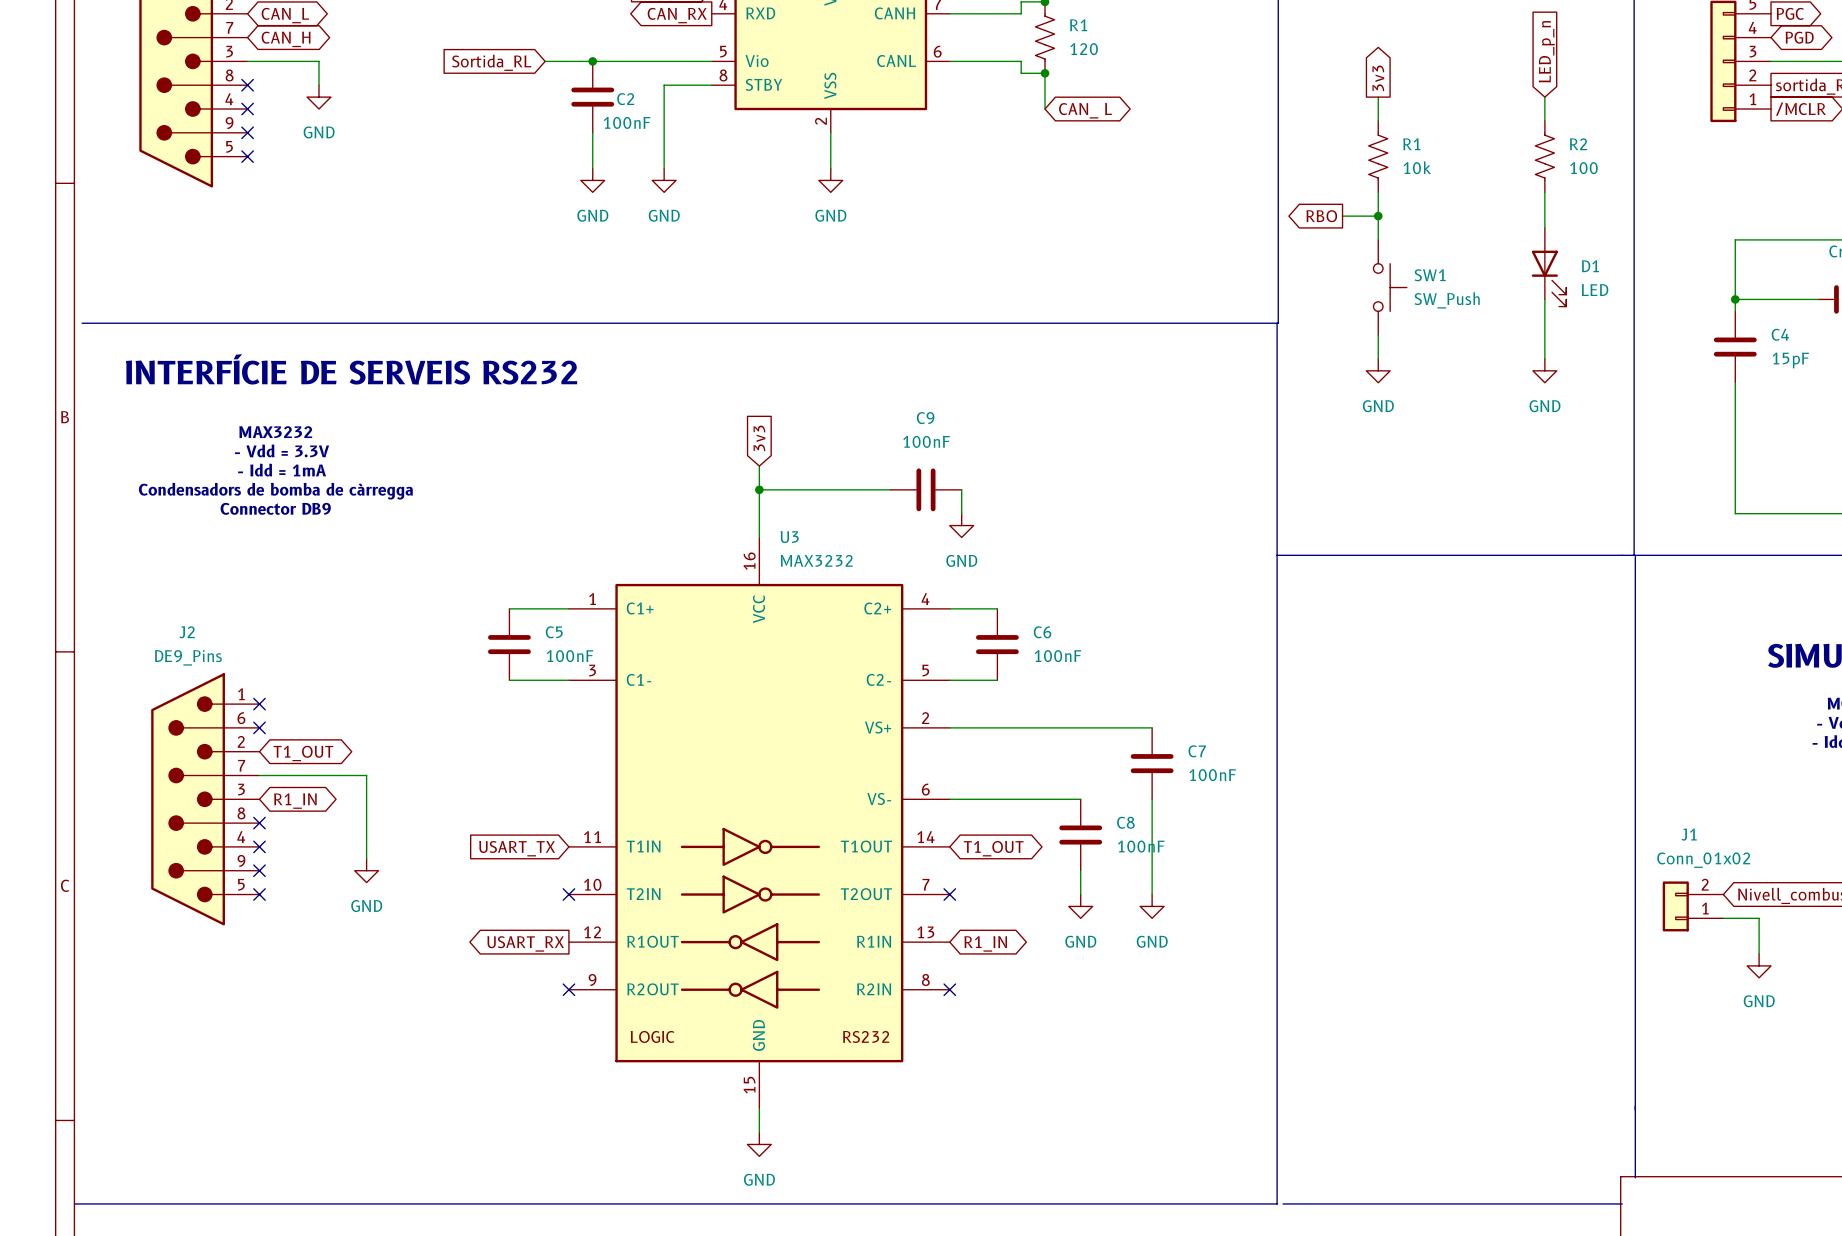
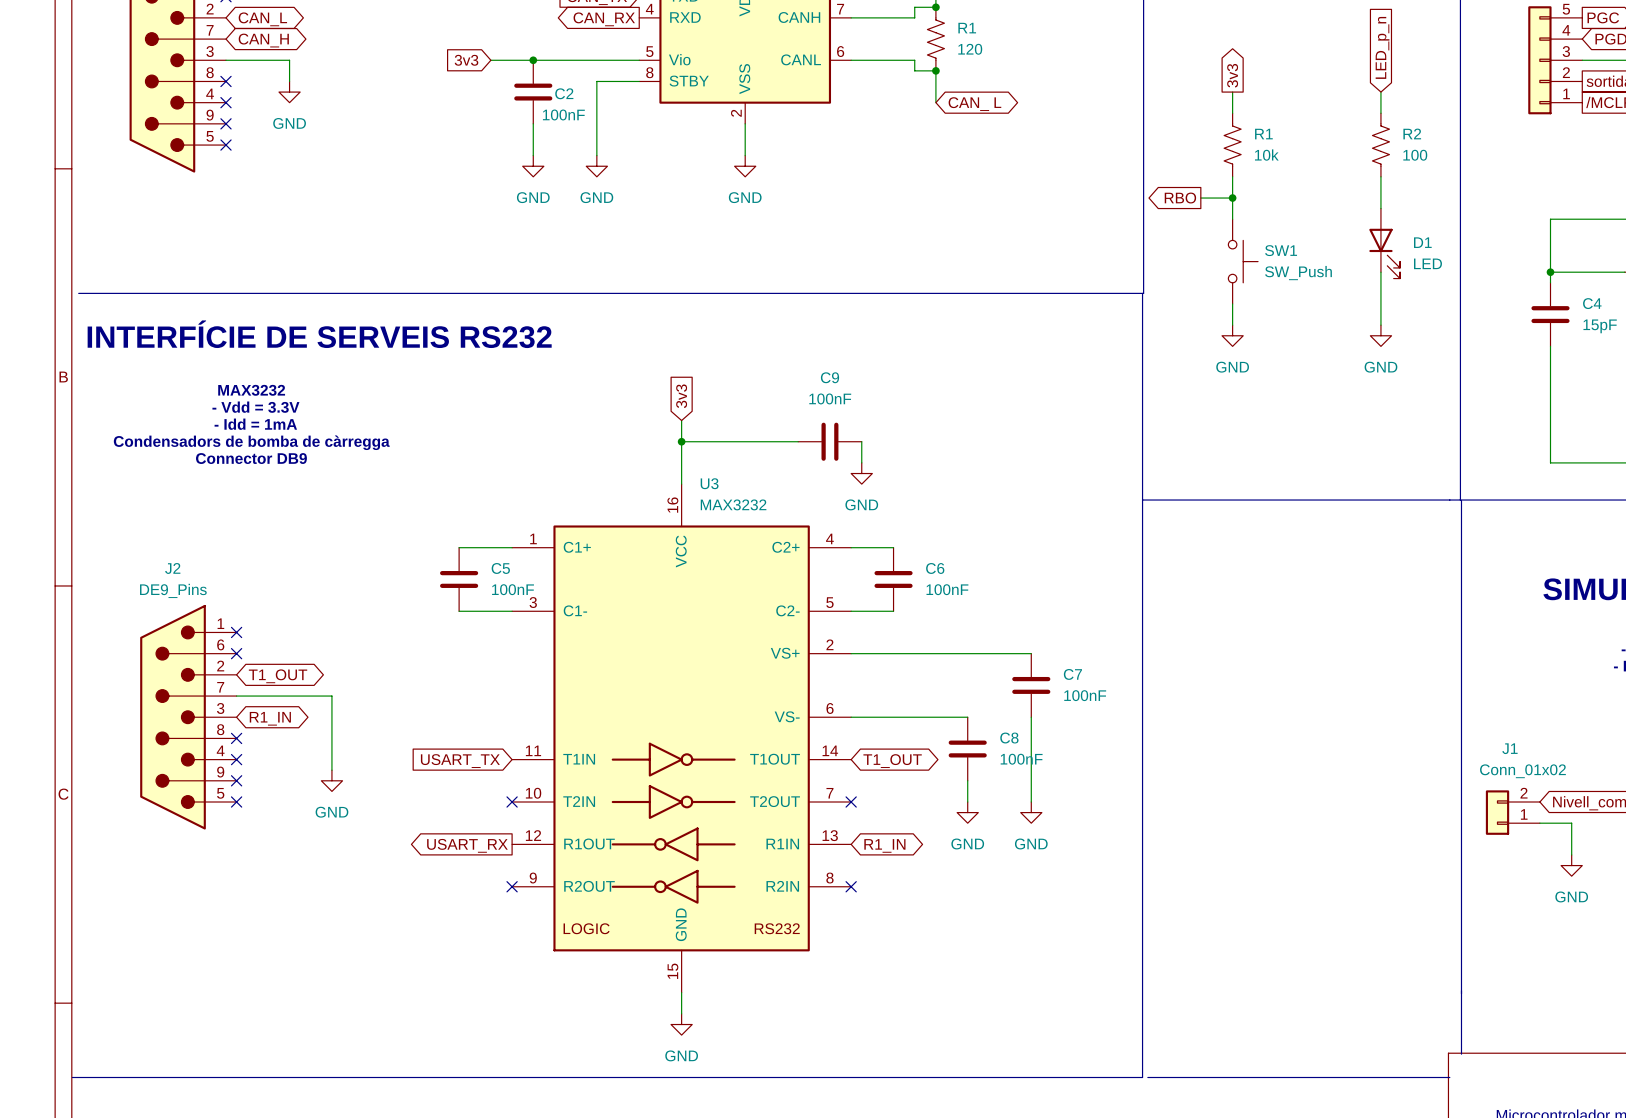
global label: Sortida_RL (491, 62) -> 3v3 (466, 60)

